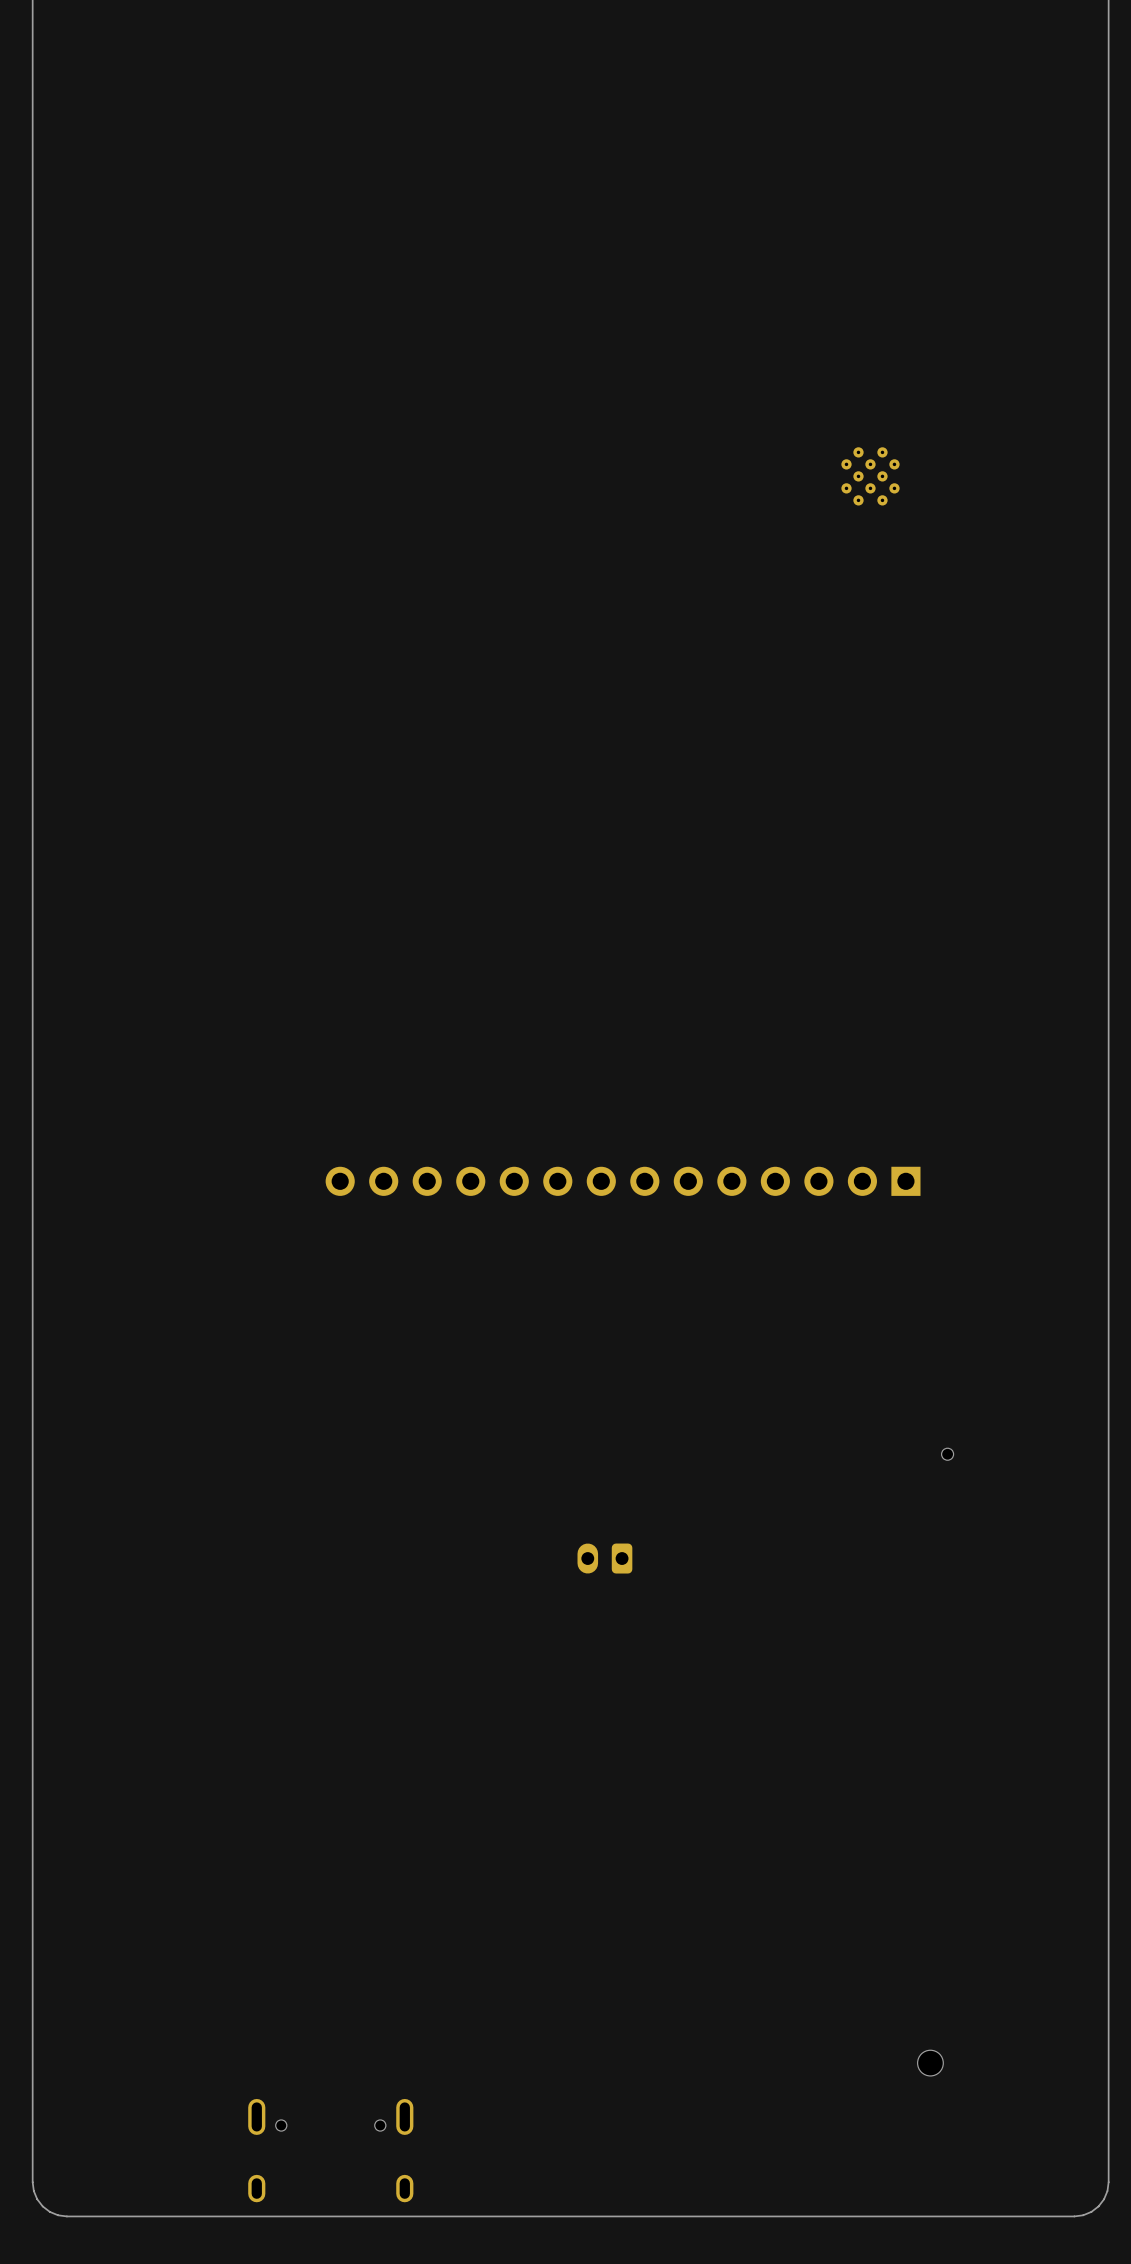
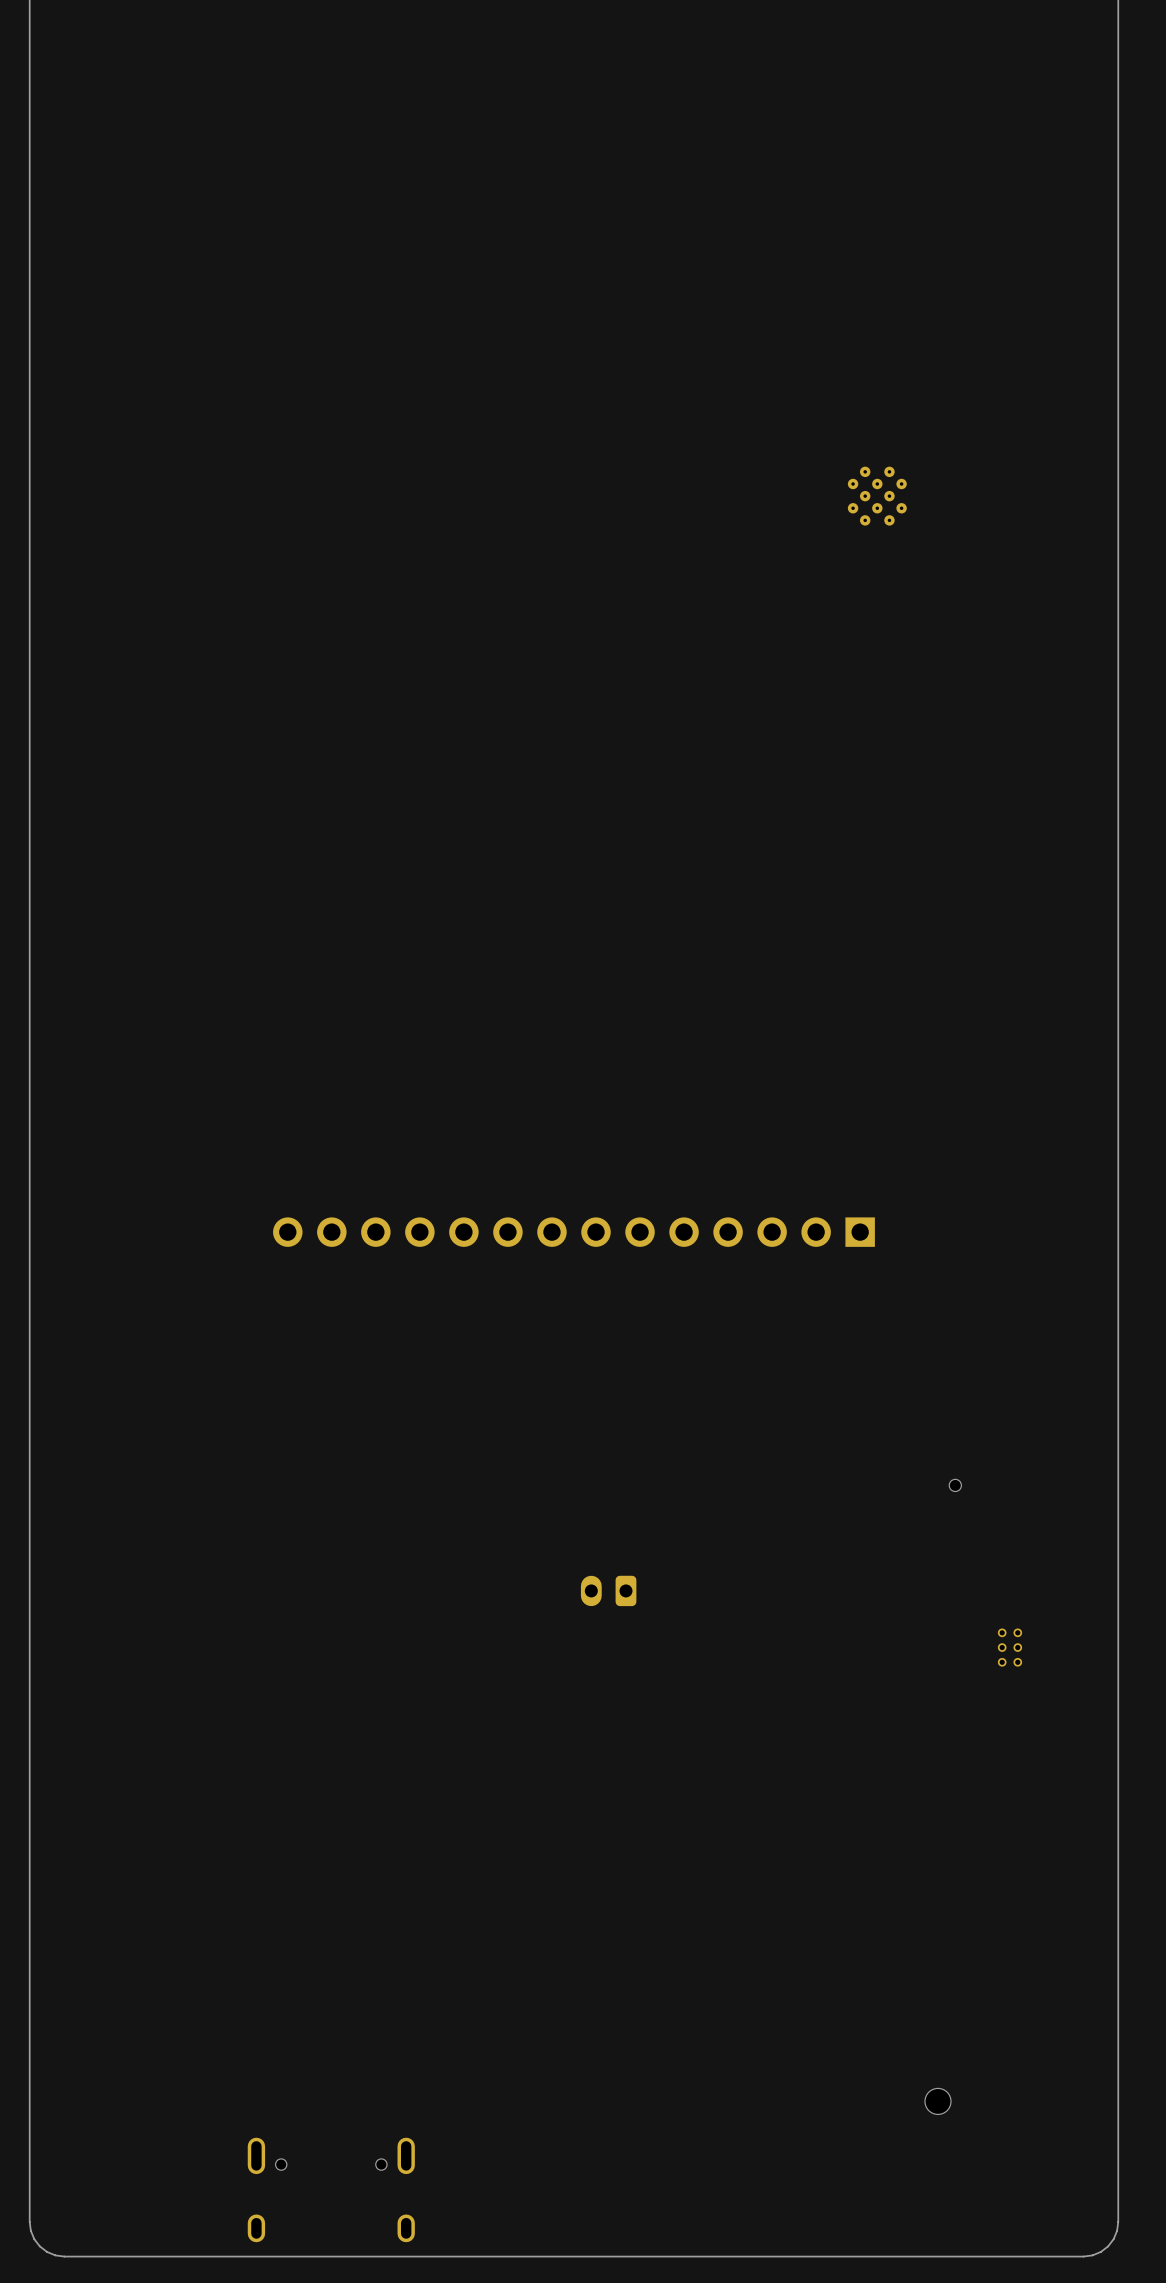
part position: (623, 1181) -> (573, 1232)
part: none -> (1009, 1647)

